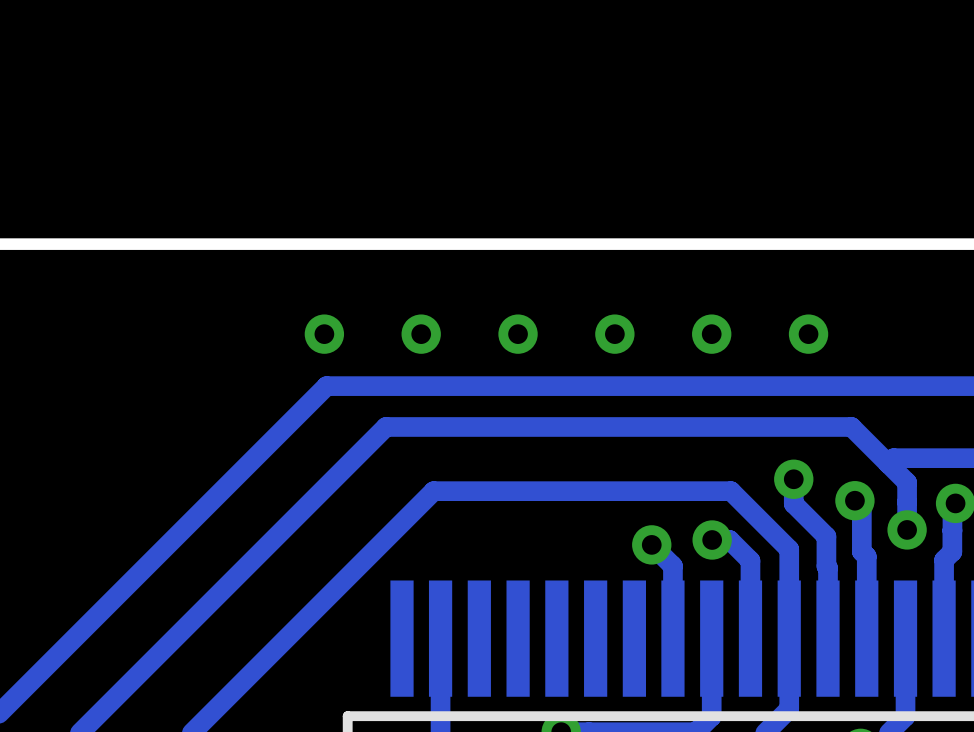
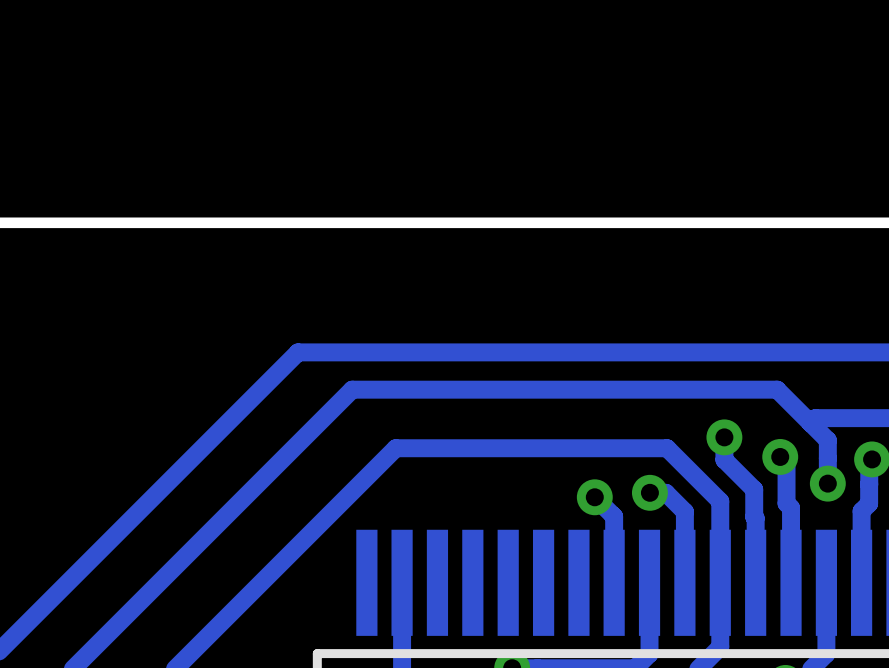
part: (324, 334) -> none
part: (421, 334) -> none
part: (518, 334) -> none
part: (614, 334) -> none
part: (711, 334) -> none
part: (808, 334) -> none

